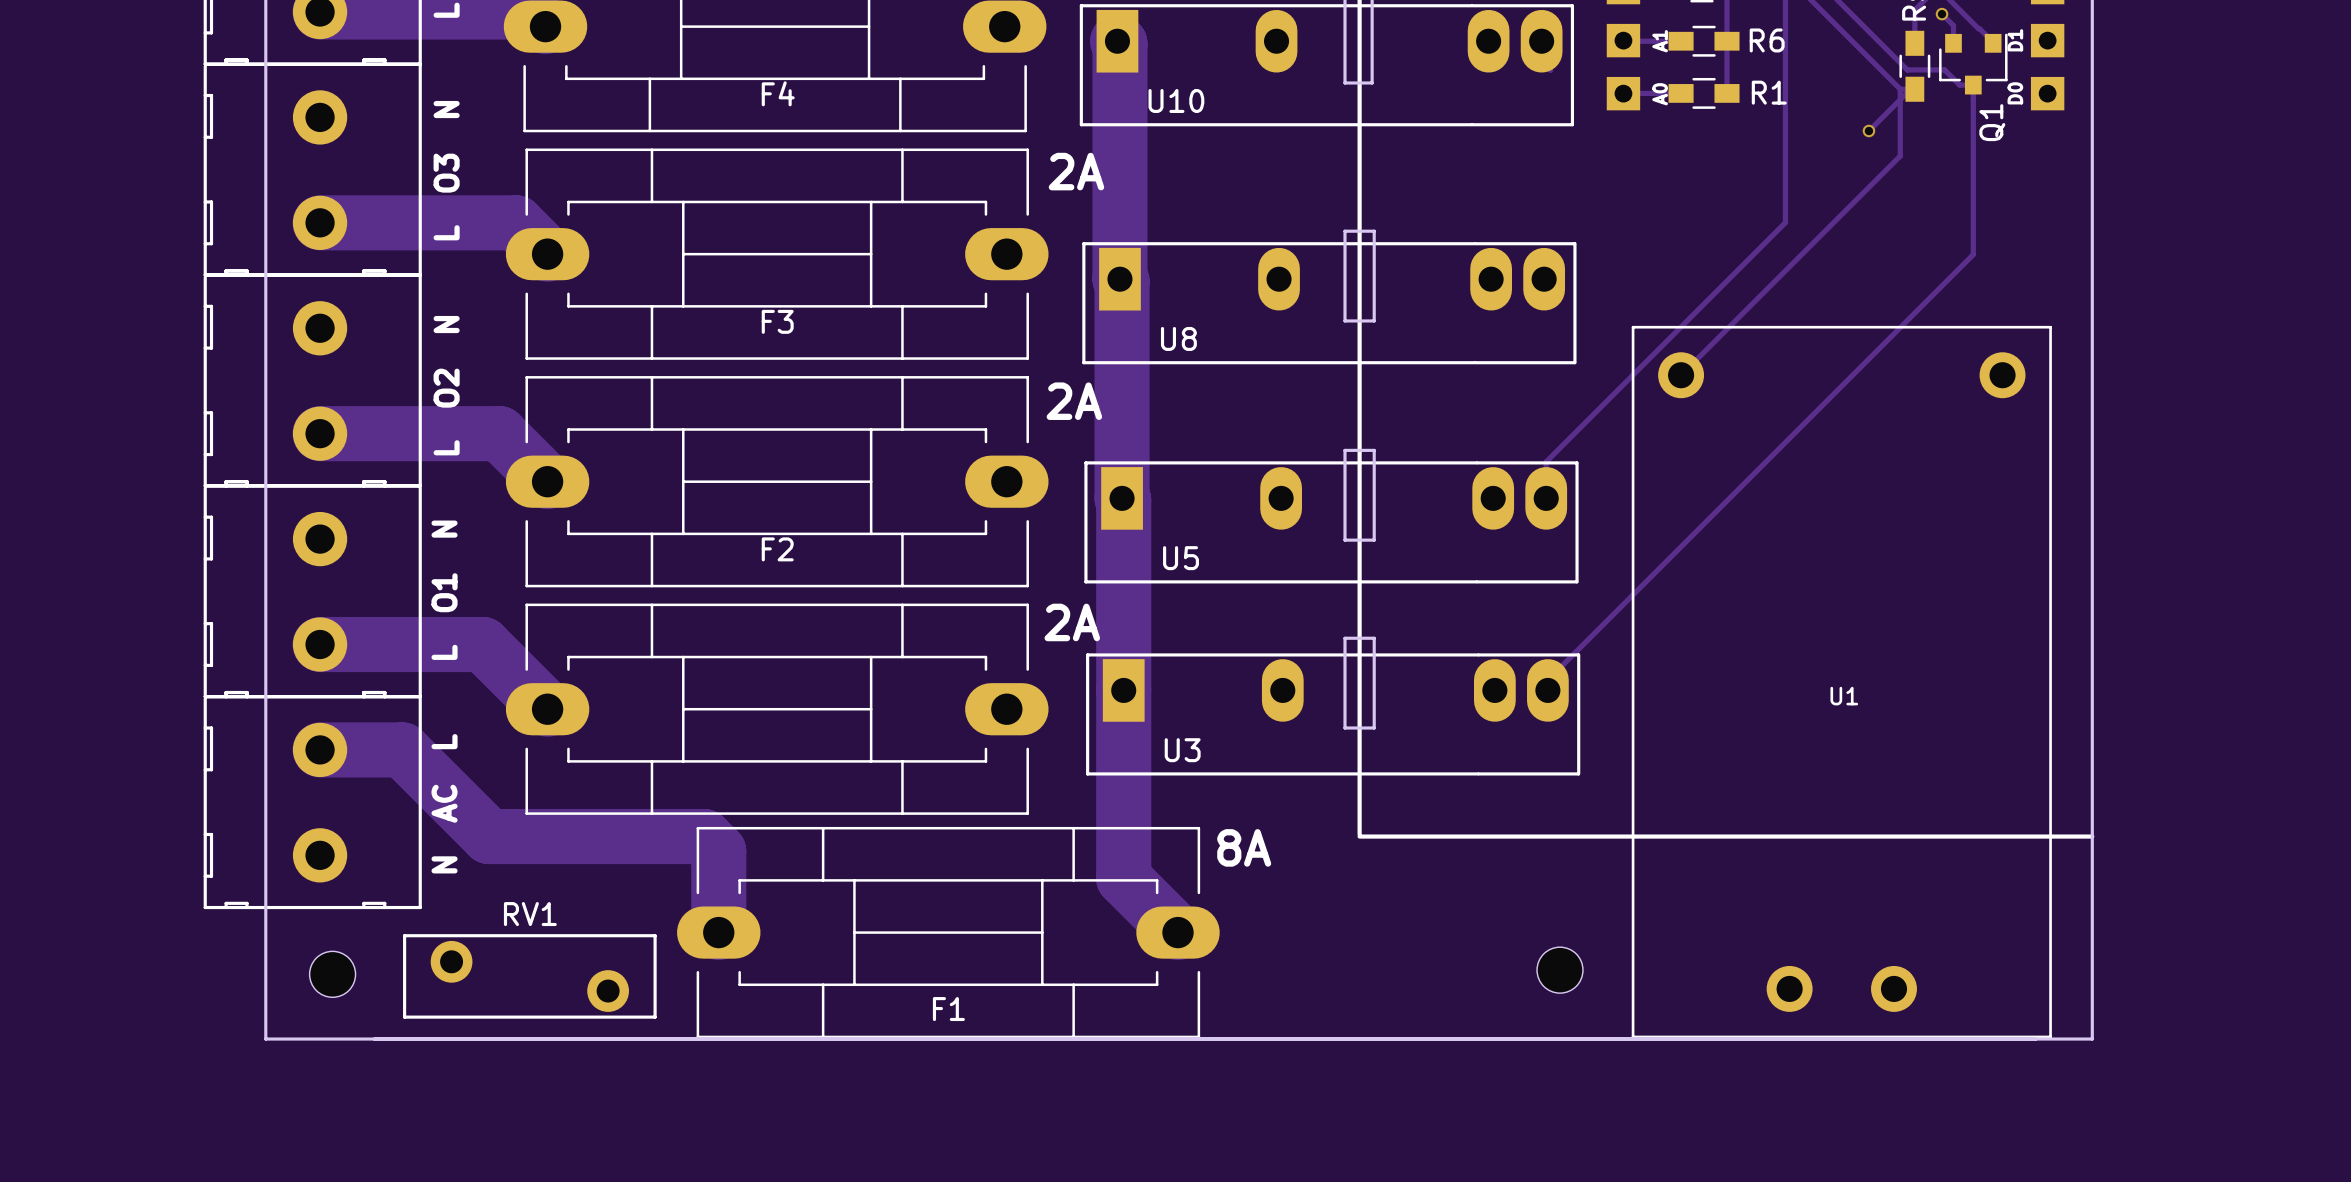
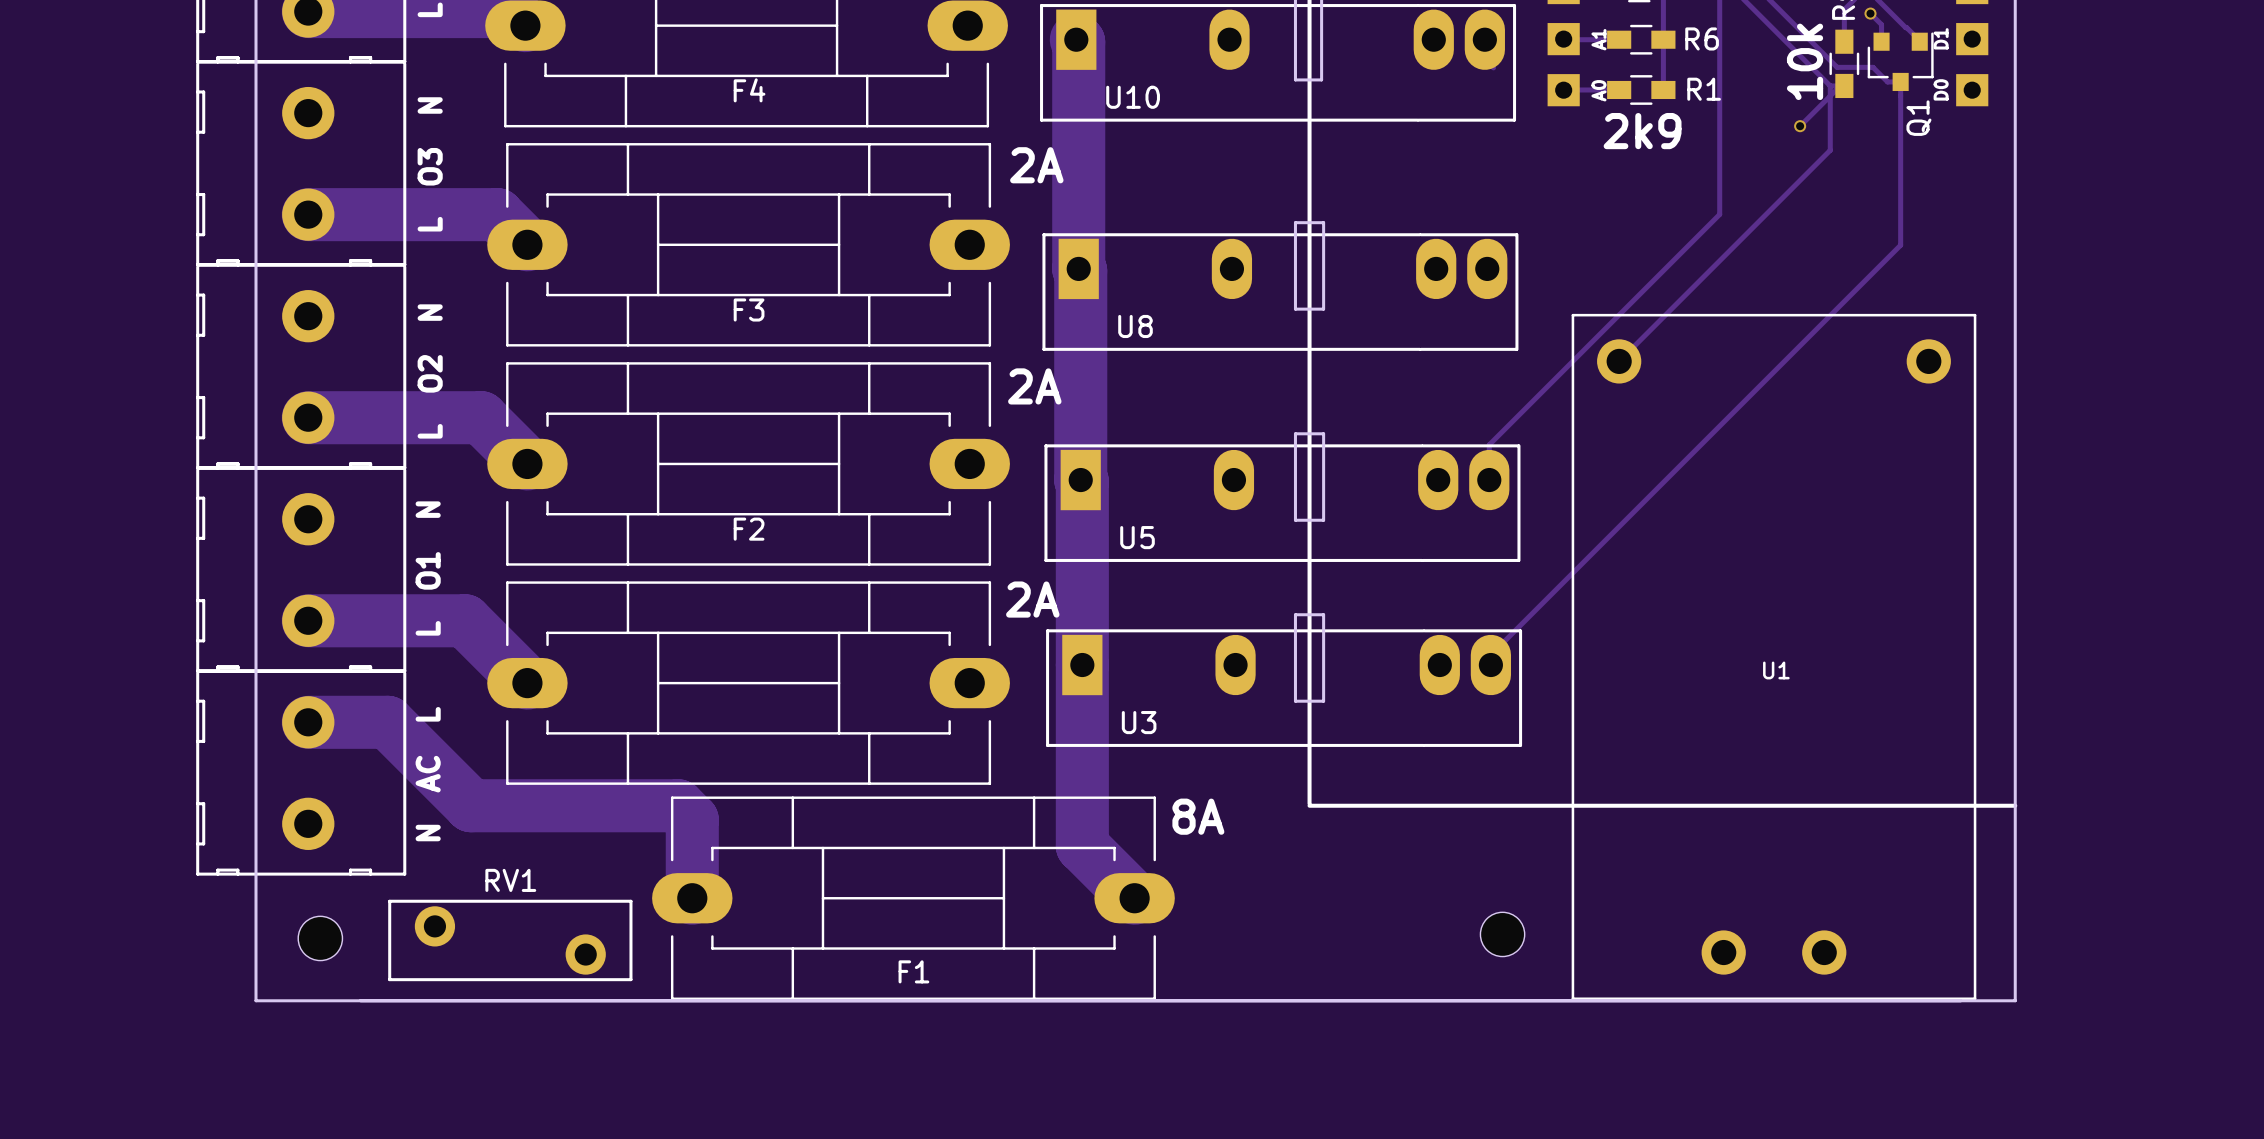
text: none -> 10k (1805, 61)
text: none -> 2k9 (1642, 131)

